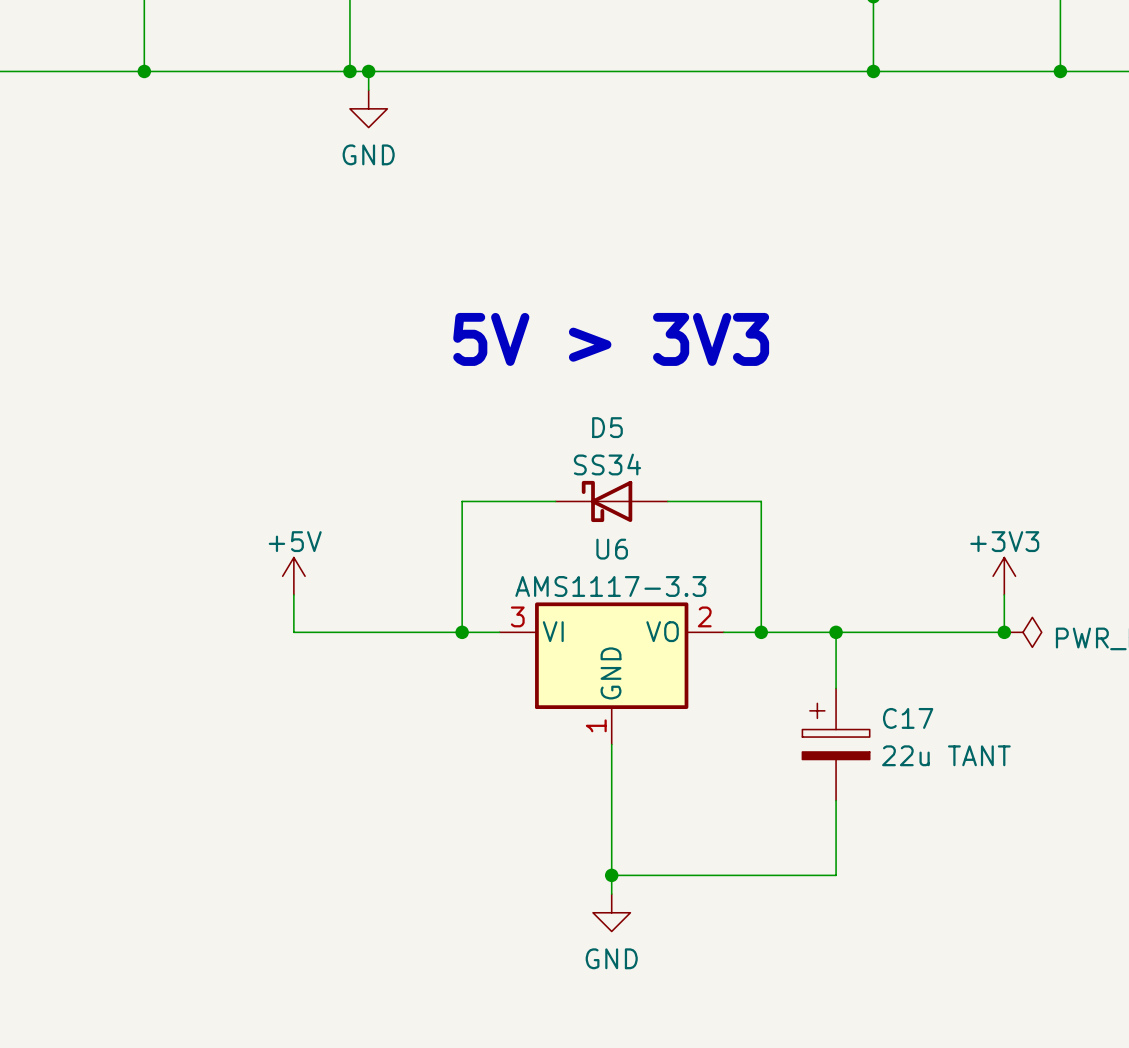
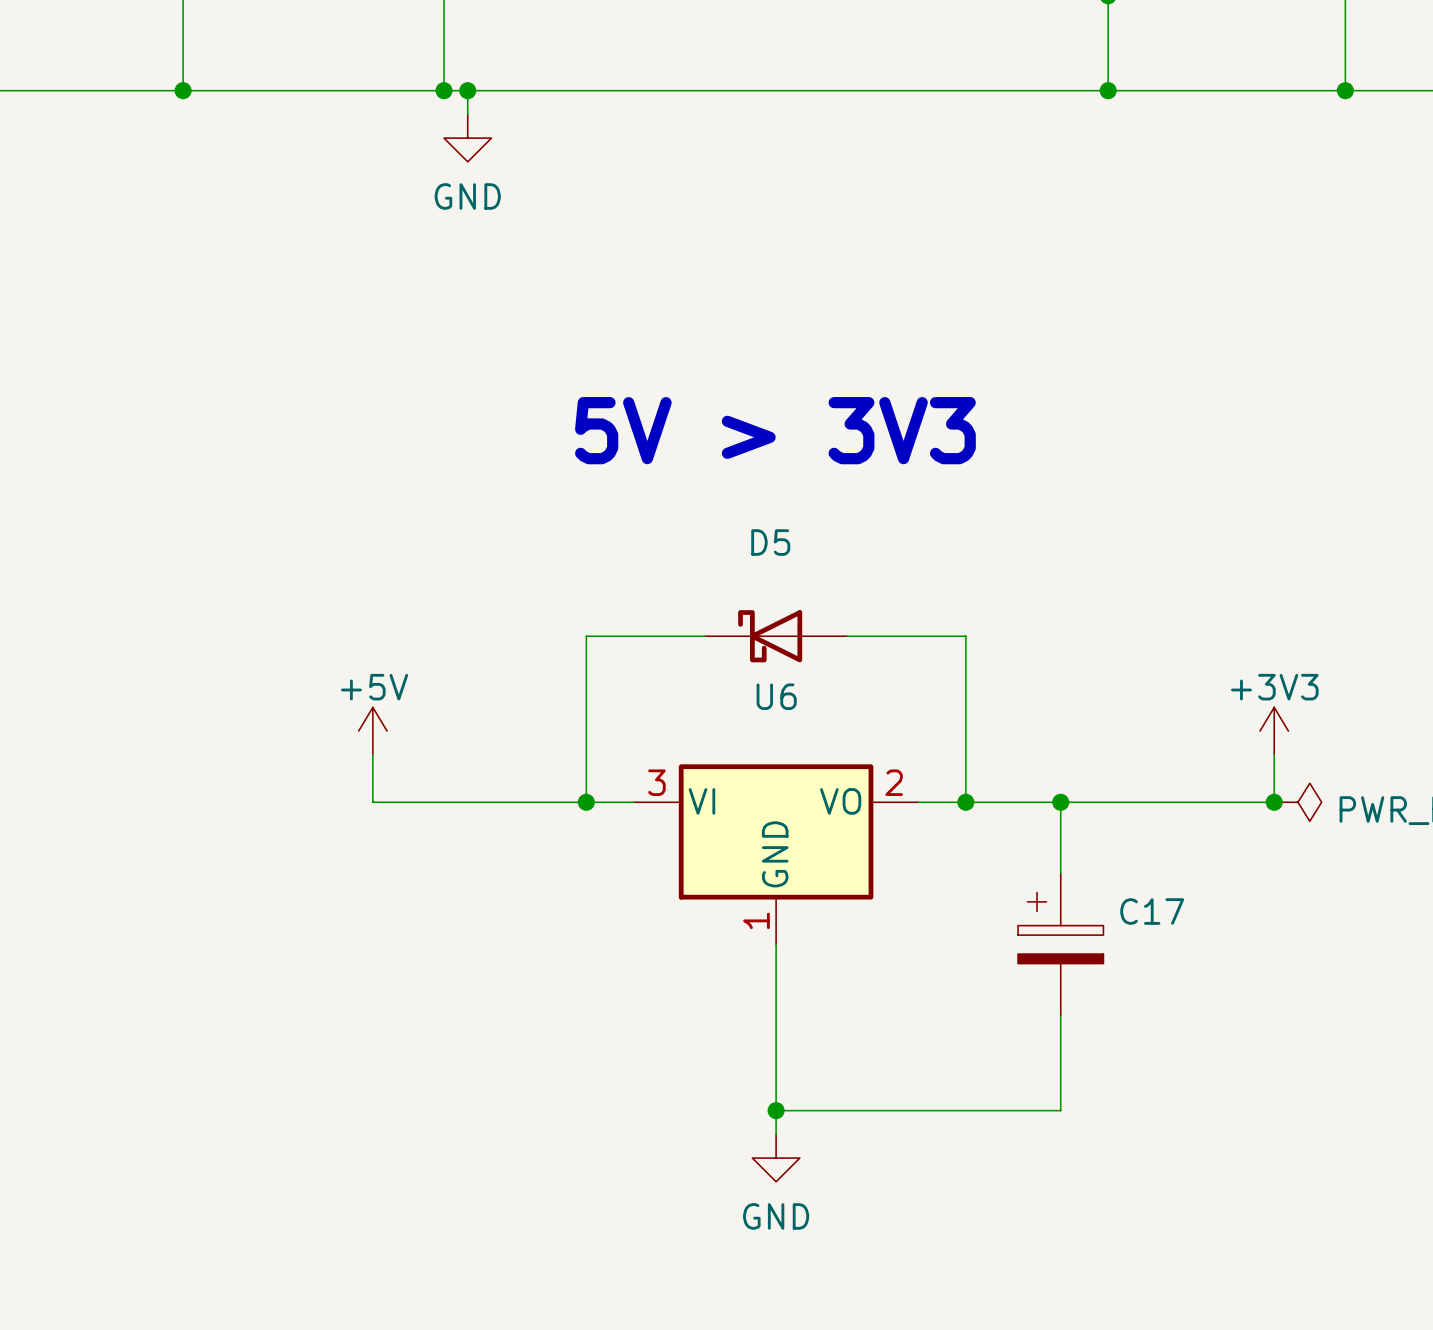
D5 value: SS34 (607, 464) -> none
U6 value: AMS1117-3.3 (610, 586) -> none
C17 value: 22u TANT (946, 755) -> none

